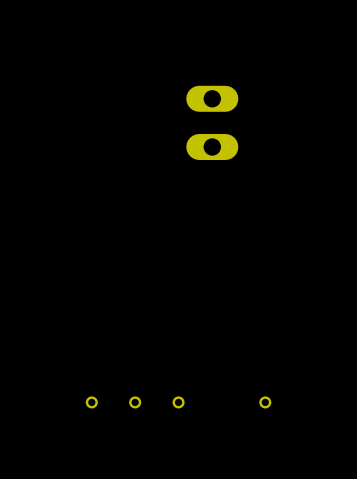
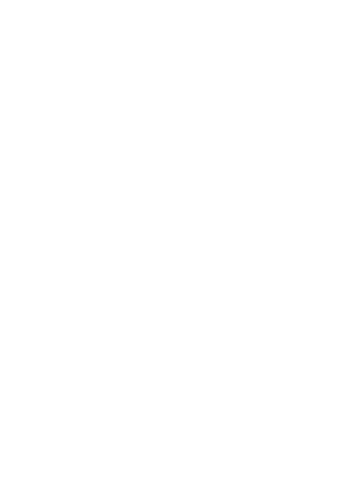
part: (212, 122) -> none
part: (91, 402) -> none
part: (135, 402) -> none
part: (178, 402) -> none
part: (265, 402) -> none

